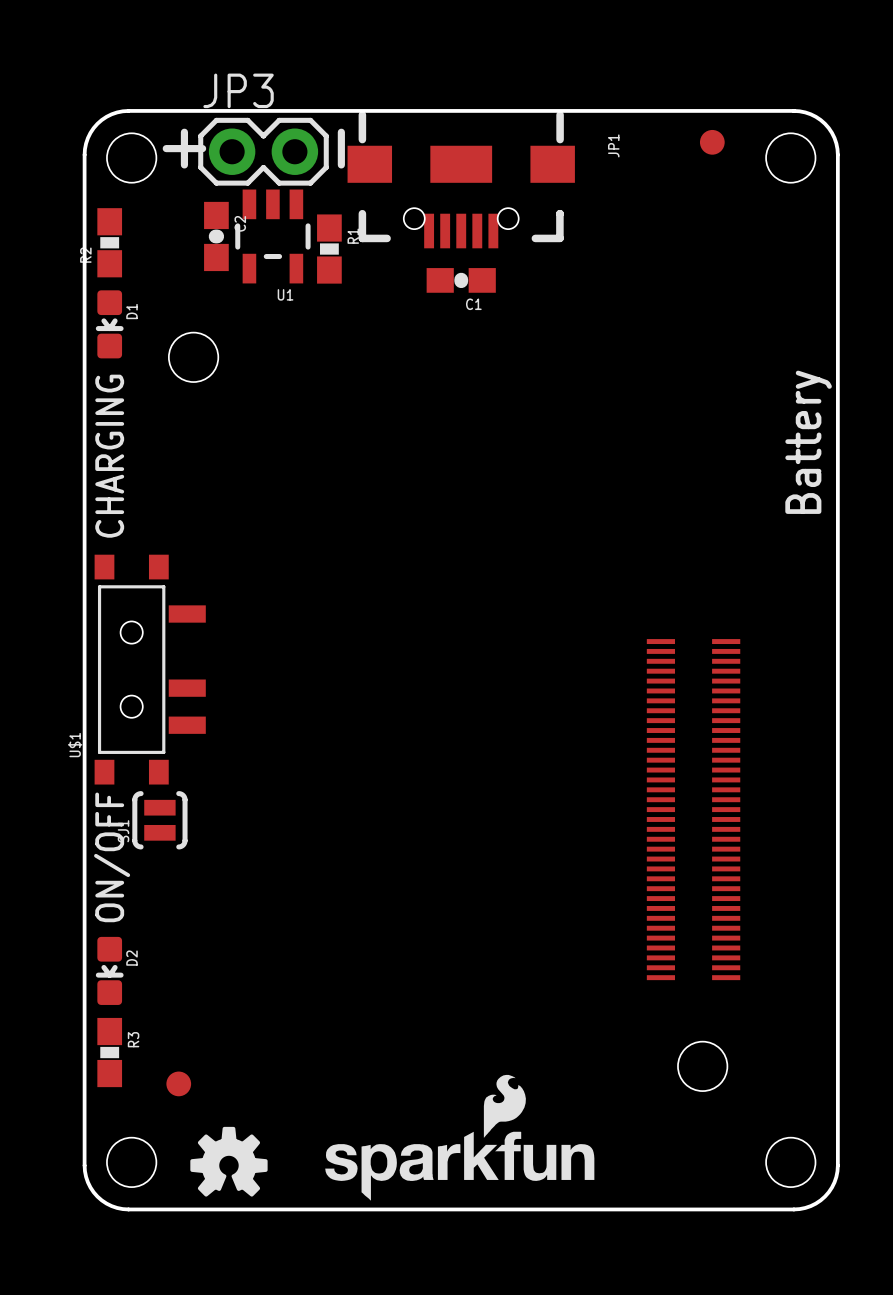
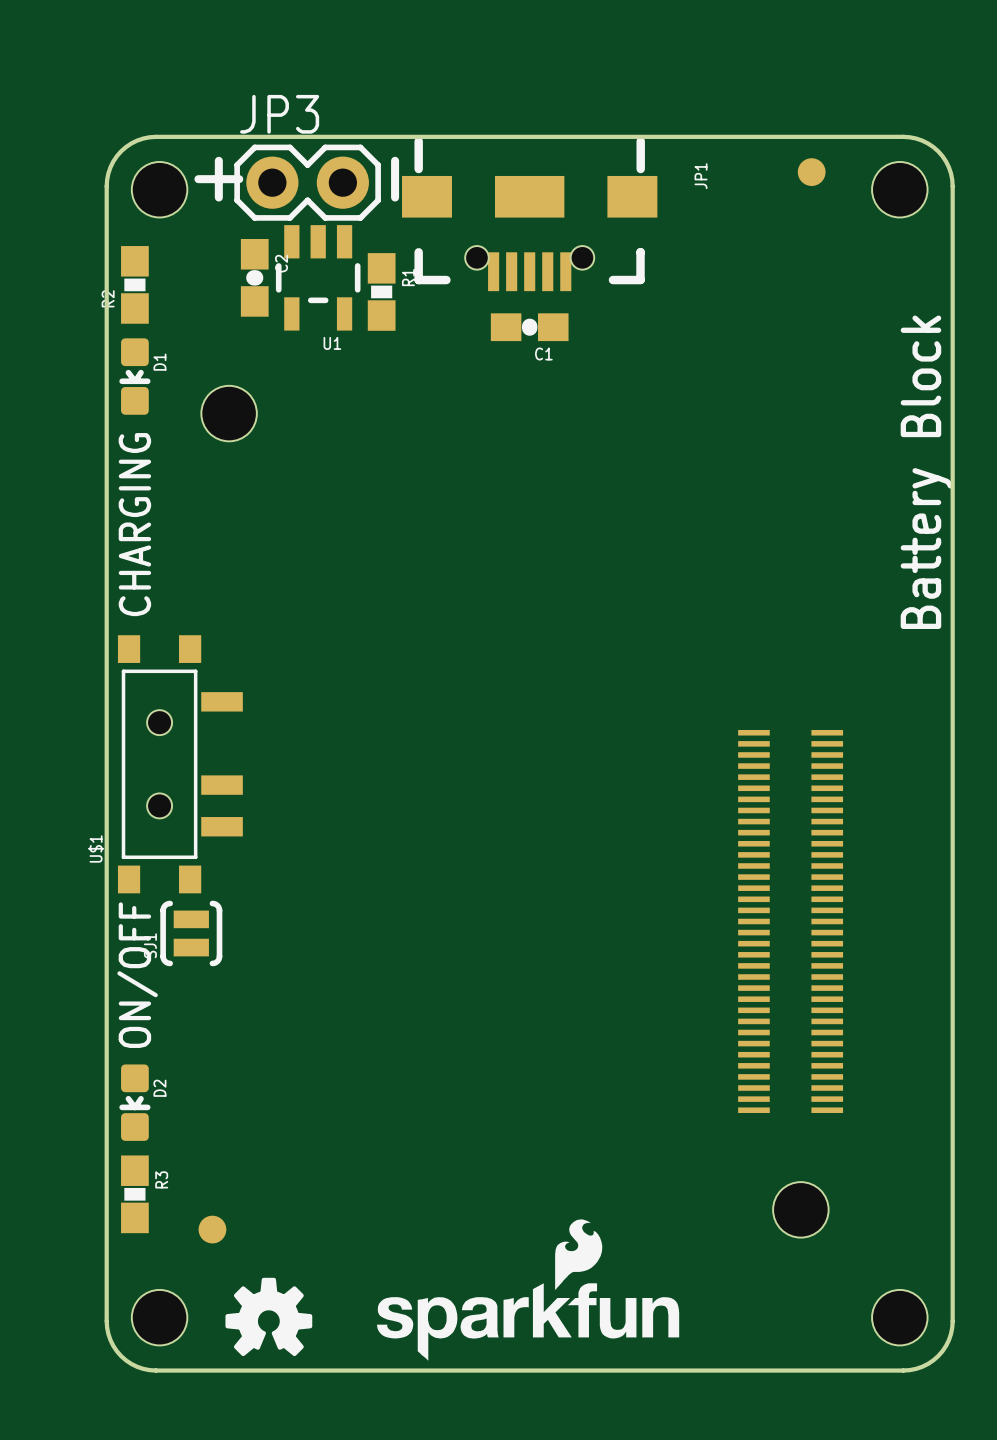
text: Battery (808, 442) -> Battery Block (926, 472)

